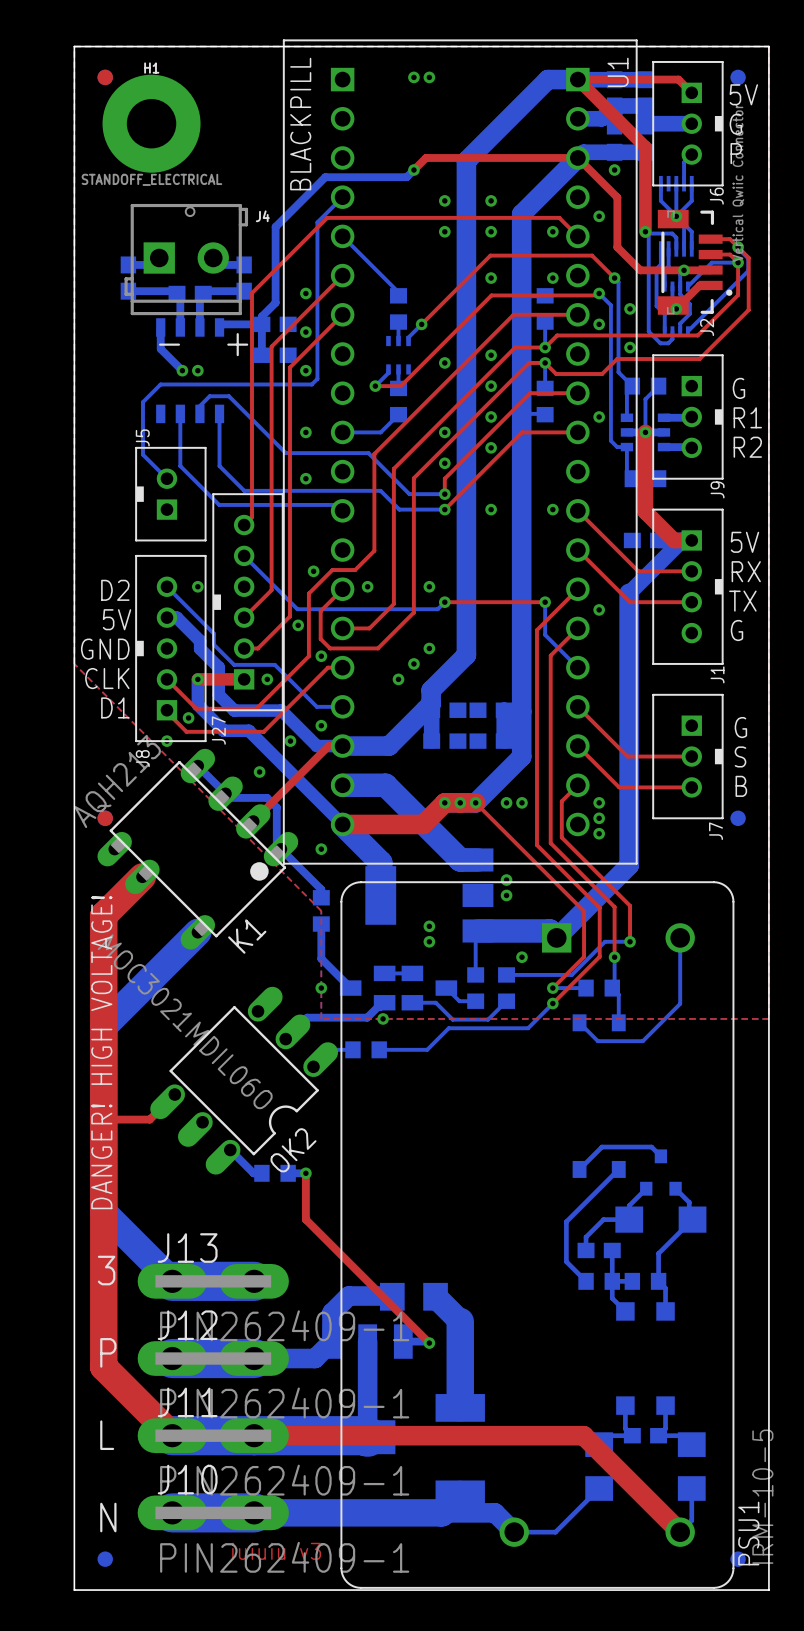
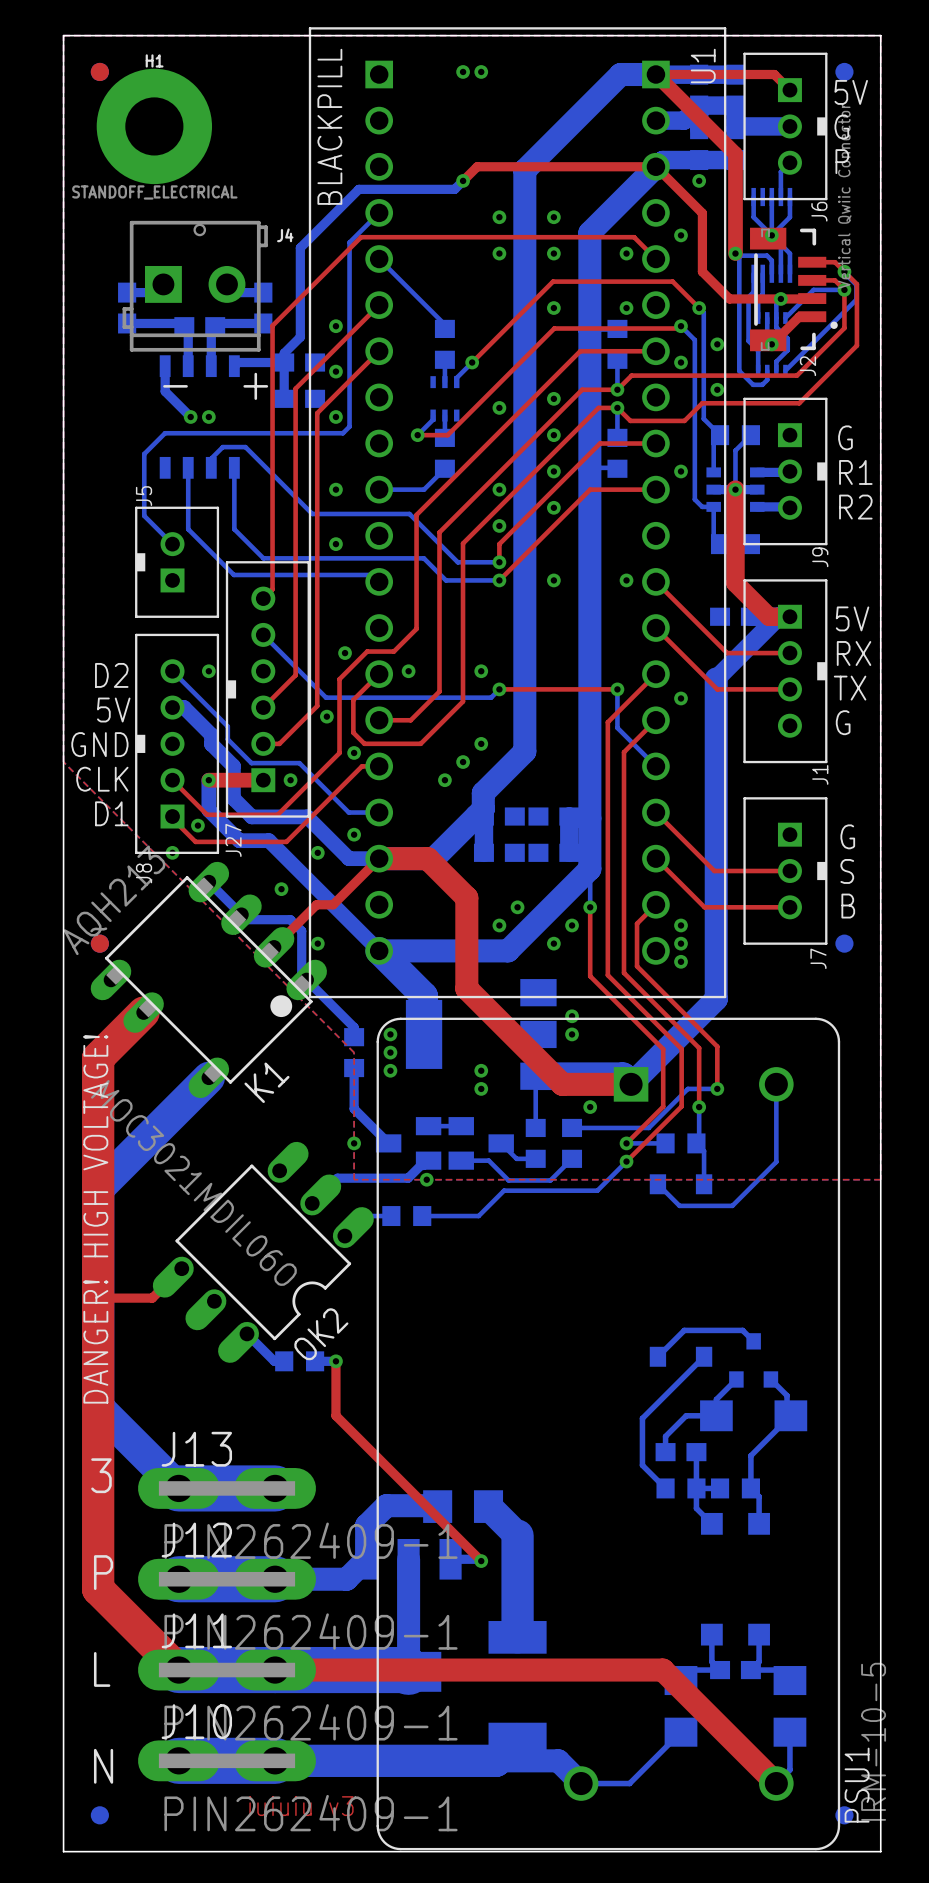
top track: (342, 746) (328, 746) (289, 785) -> (631, 1084) (562, 1084) (466, 988) (466, 897) (427, 858) (379, 858) (333, 904) (316, 904)
bottom track: (521, 754) (475, 802) (444, 802) -> none
bottom track: (342, 785) (385, 785) (460, 859) (478, 859) -> none
via: none -> (517, 907)
bottom track: none -> (590, 907) (589, 869) (507, 950) (379, 950)
via: (460, 802) -> none
via: (475, 802) -> none
via position: (521, 802) -> (590, 907)
via: none -> (317, 943)
via: none -> (553, 943)
top track: (342, 824) (423, 824) (444, 802) (475, 802) (584, 911) -> (590, 907) (590, 976) (663, 1049) (663, 1052)
via: (321, 849) -> none
via: none -> (390, 1034)
via: none -> (390, 1052)
via: none -> (390, 1070)

